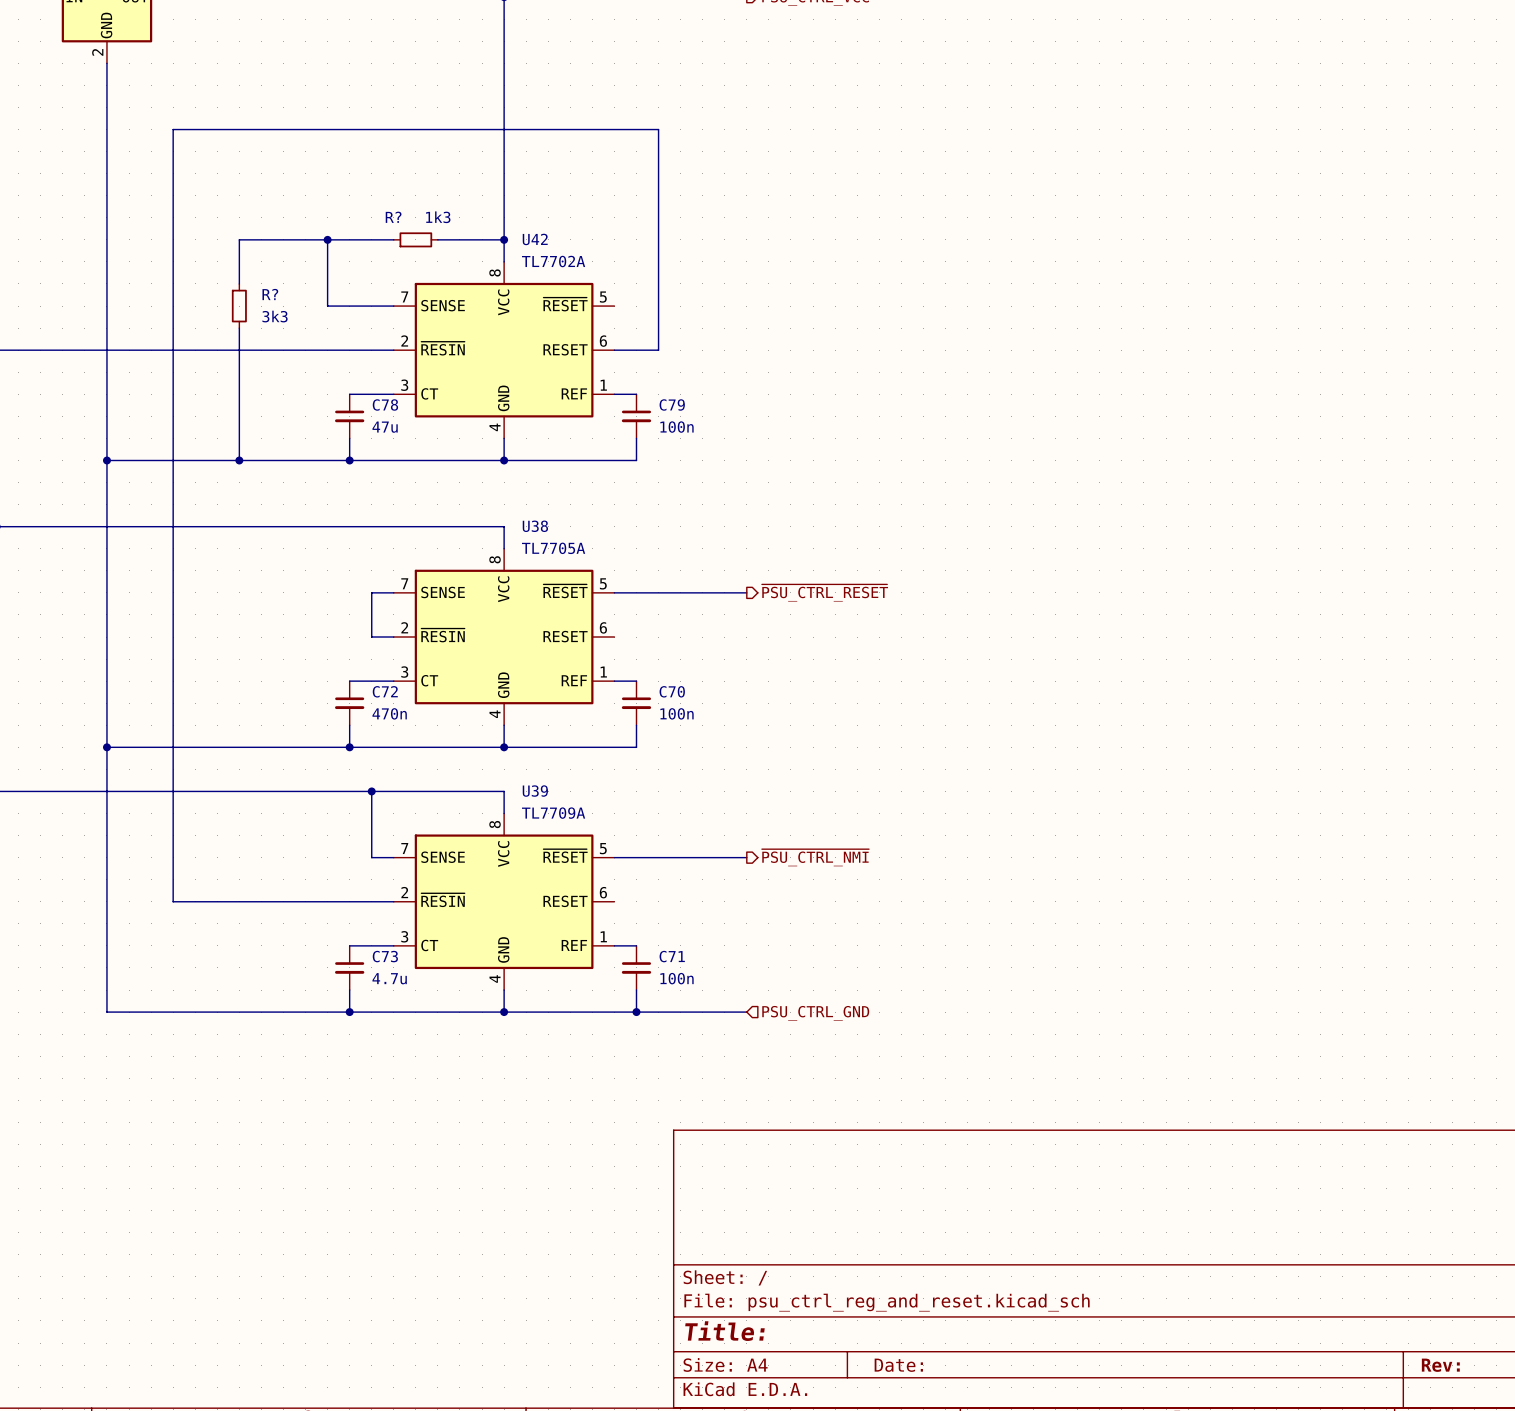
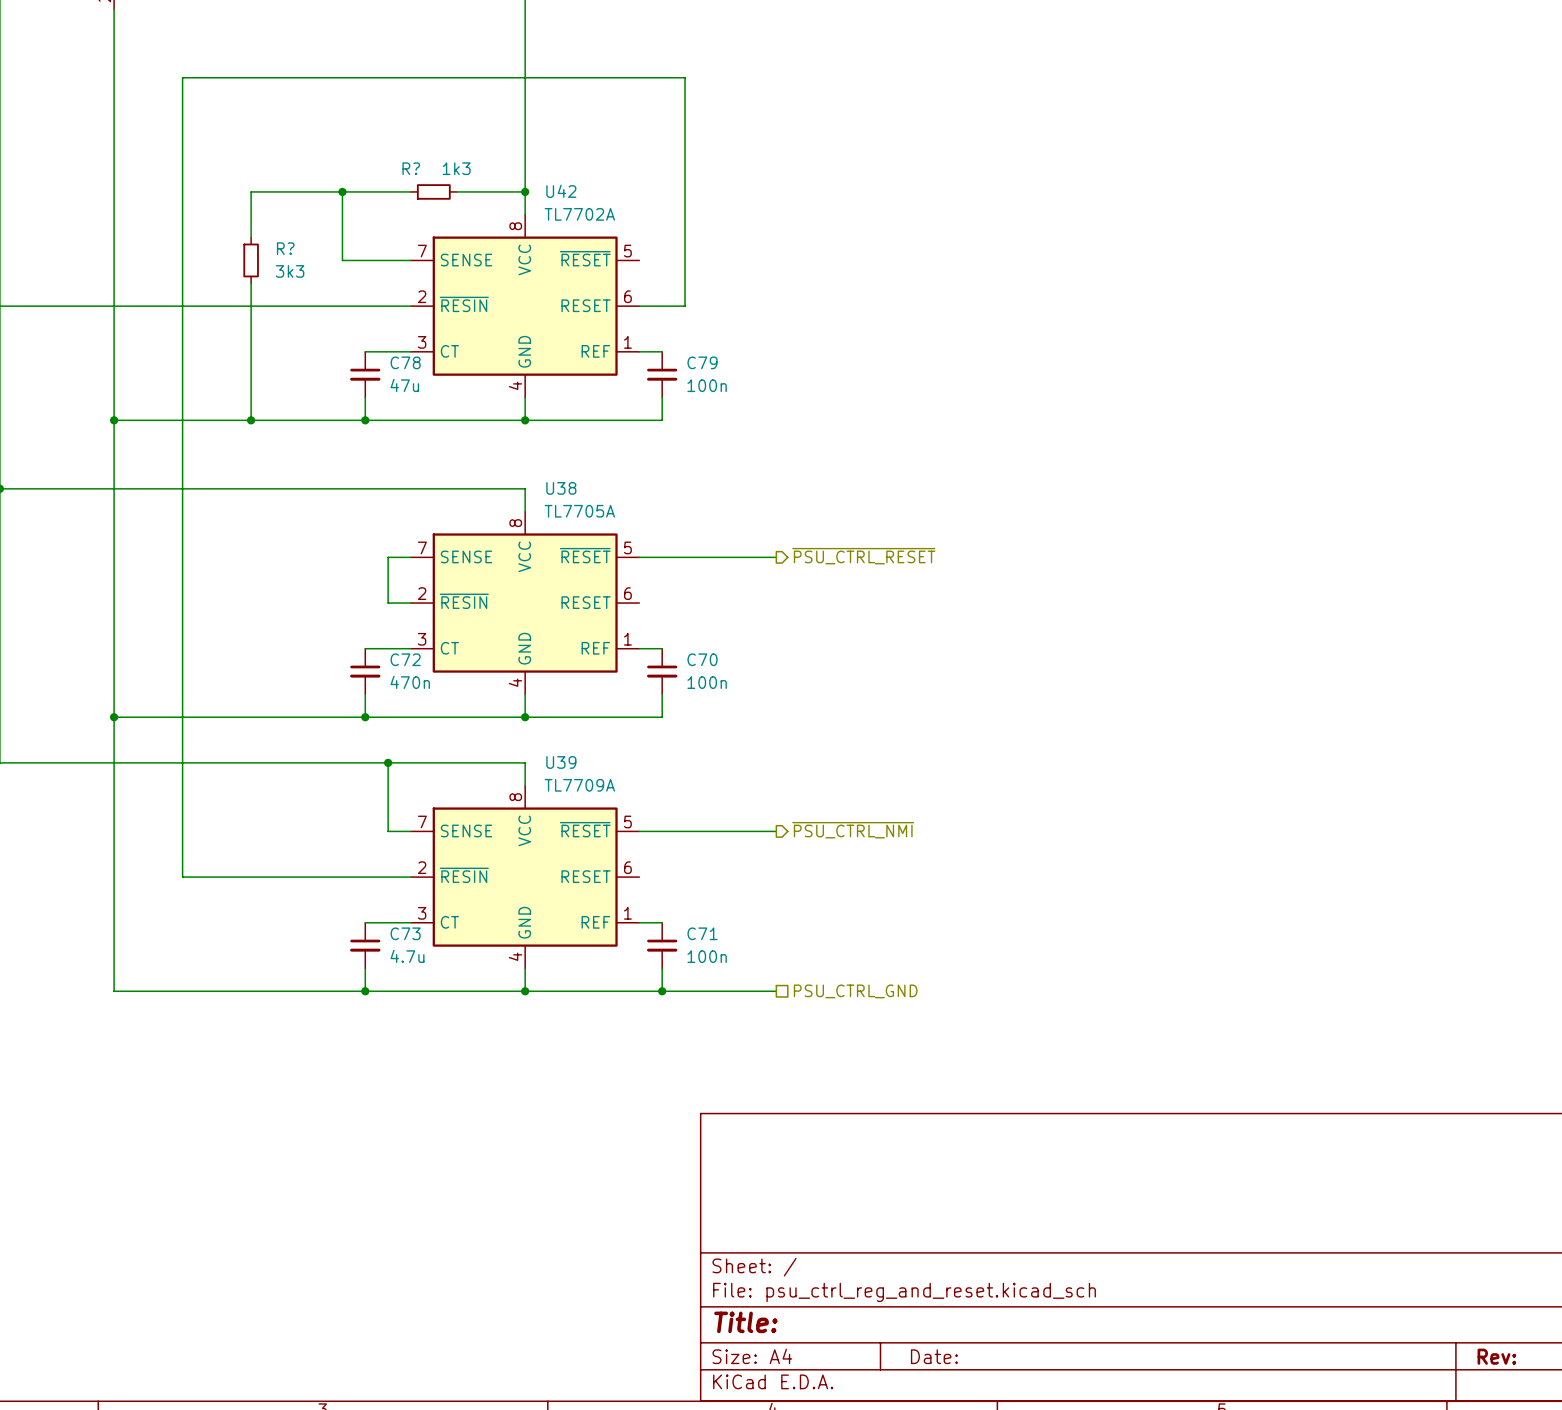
hierarchical label shape: input (815, 1013) -> passive (855, 991)

